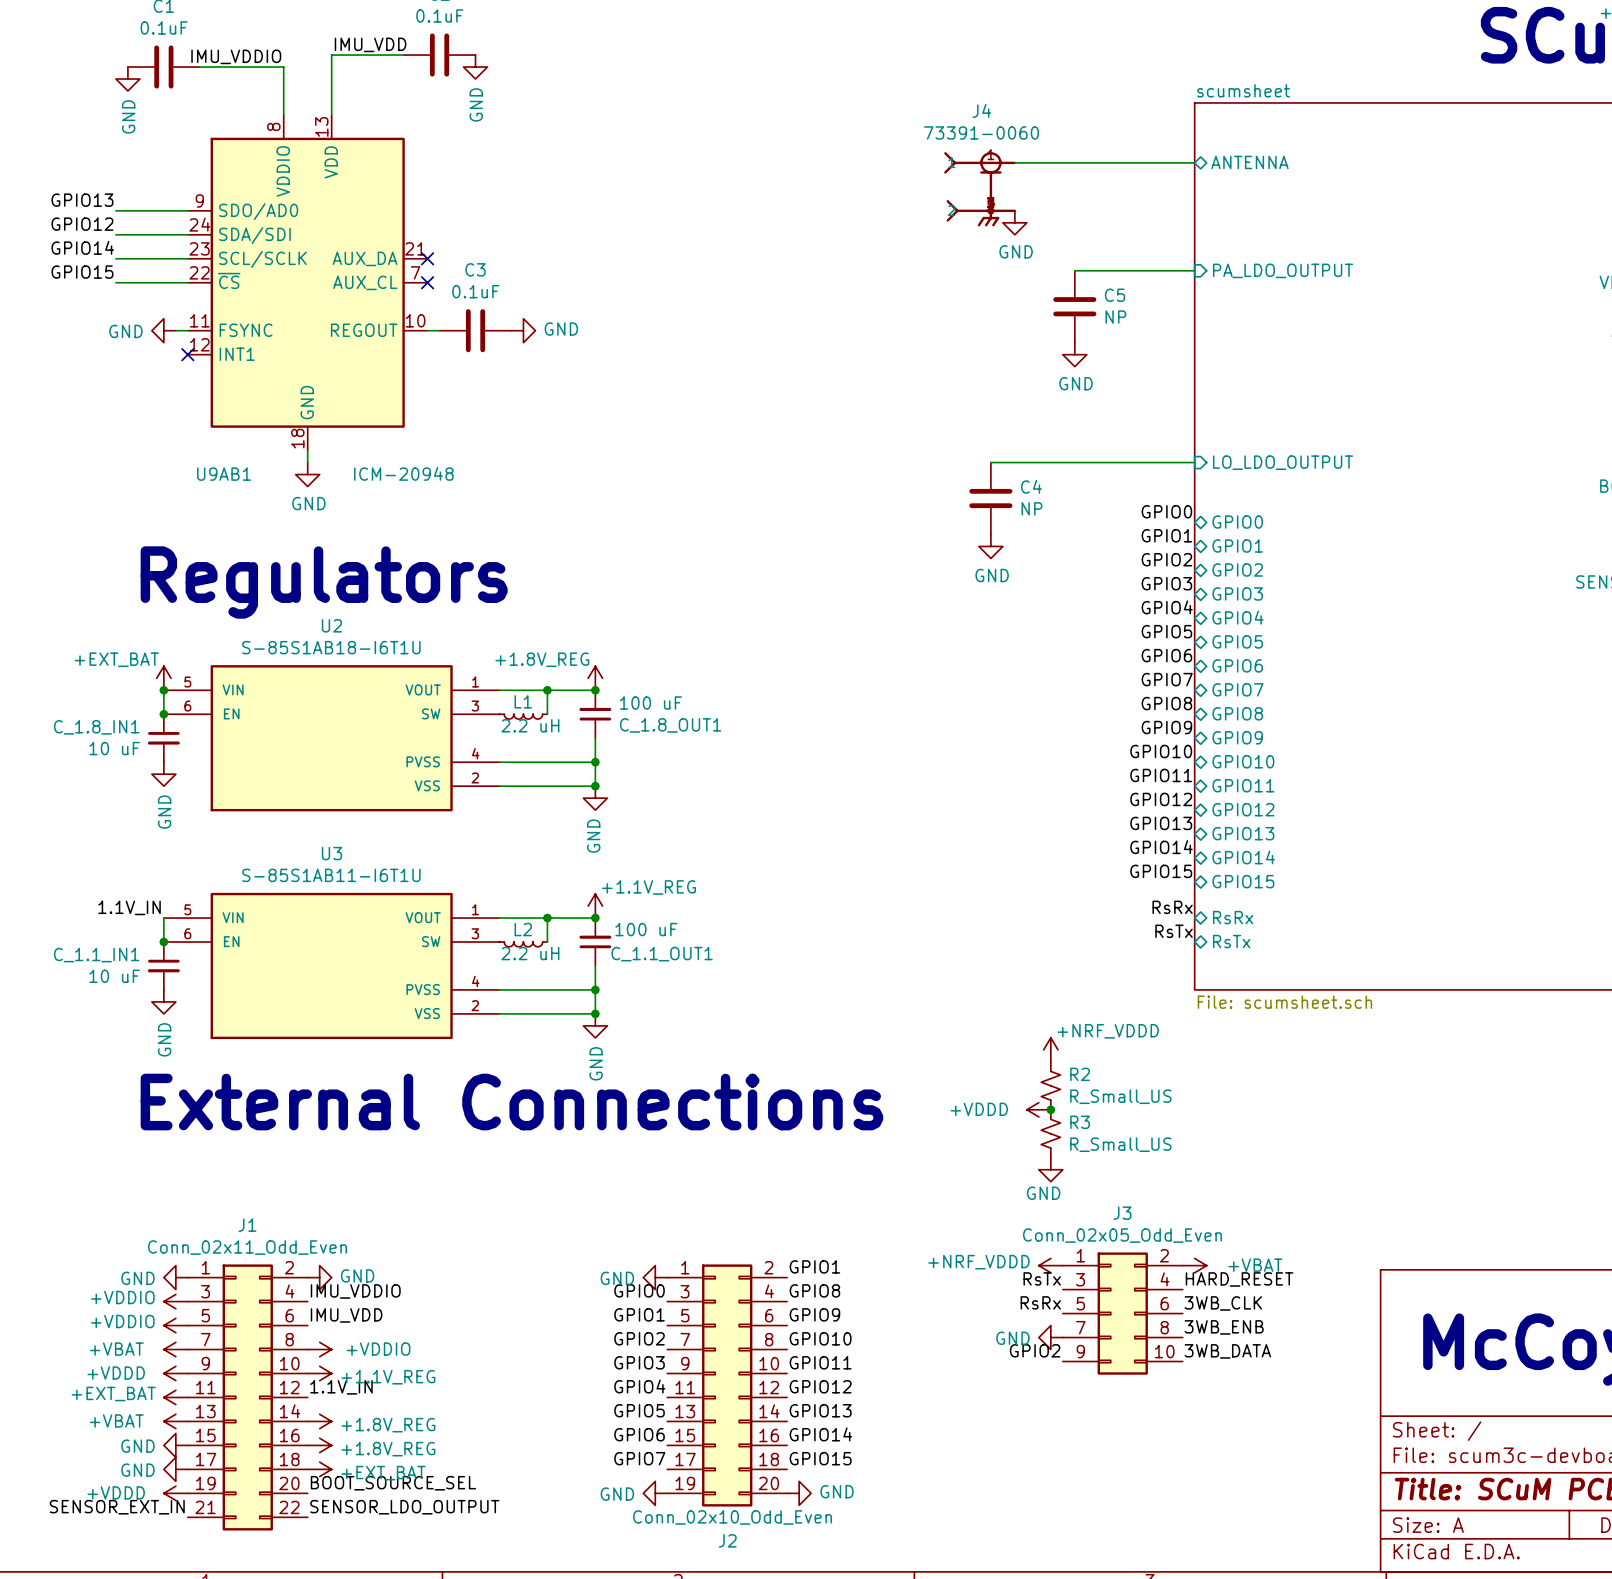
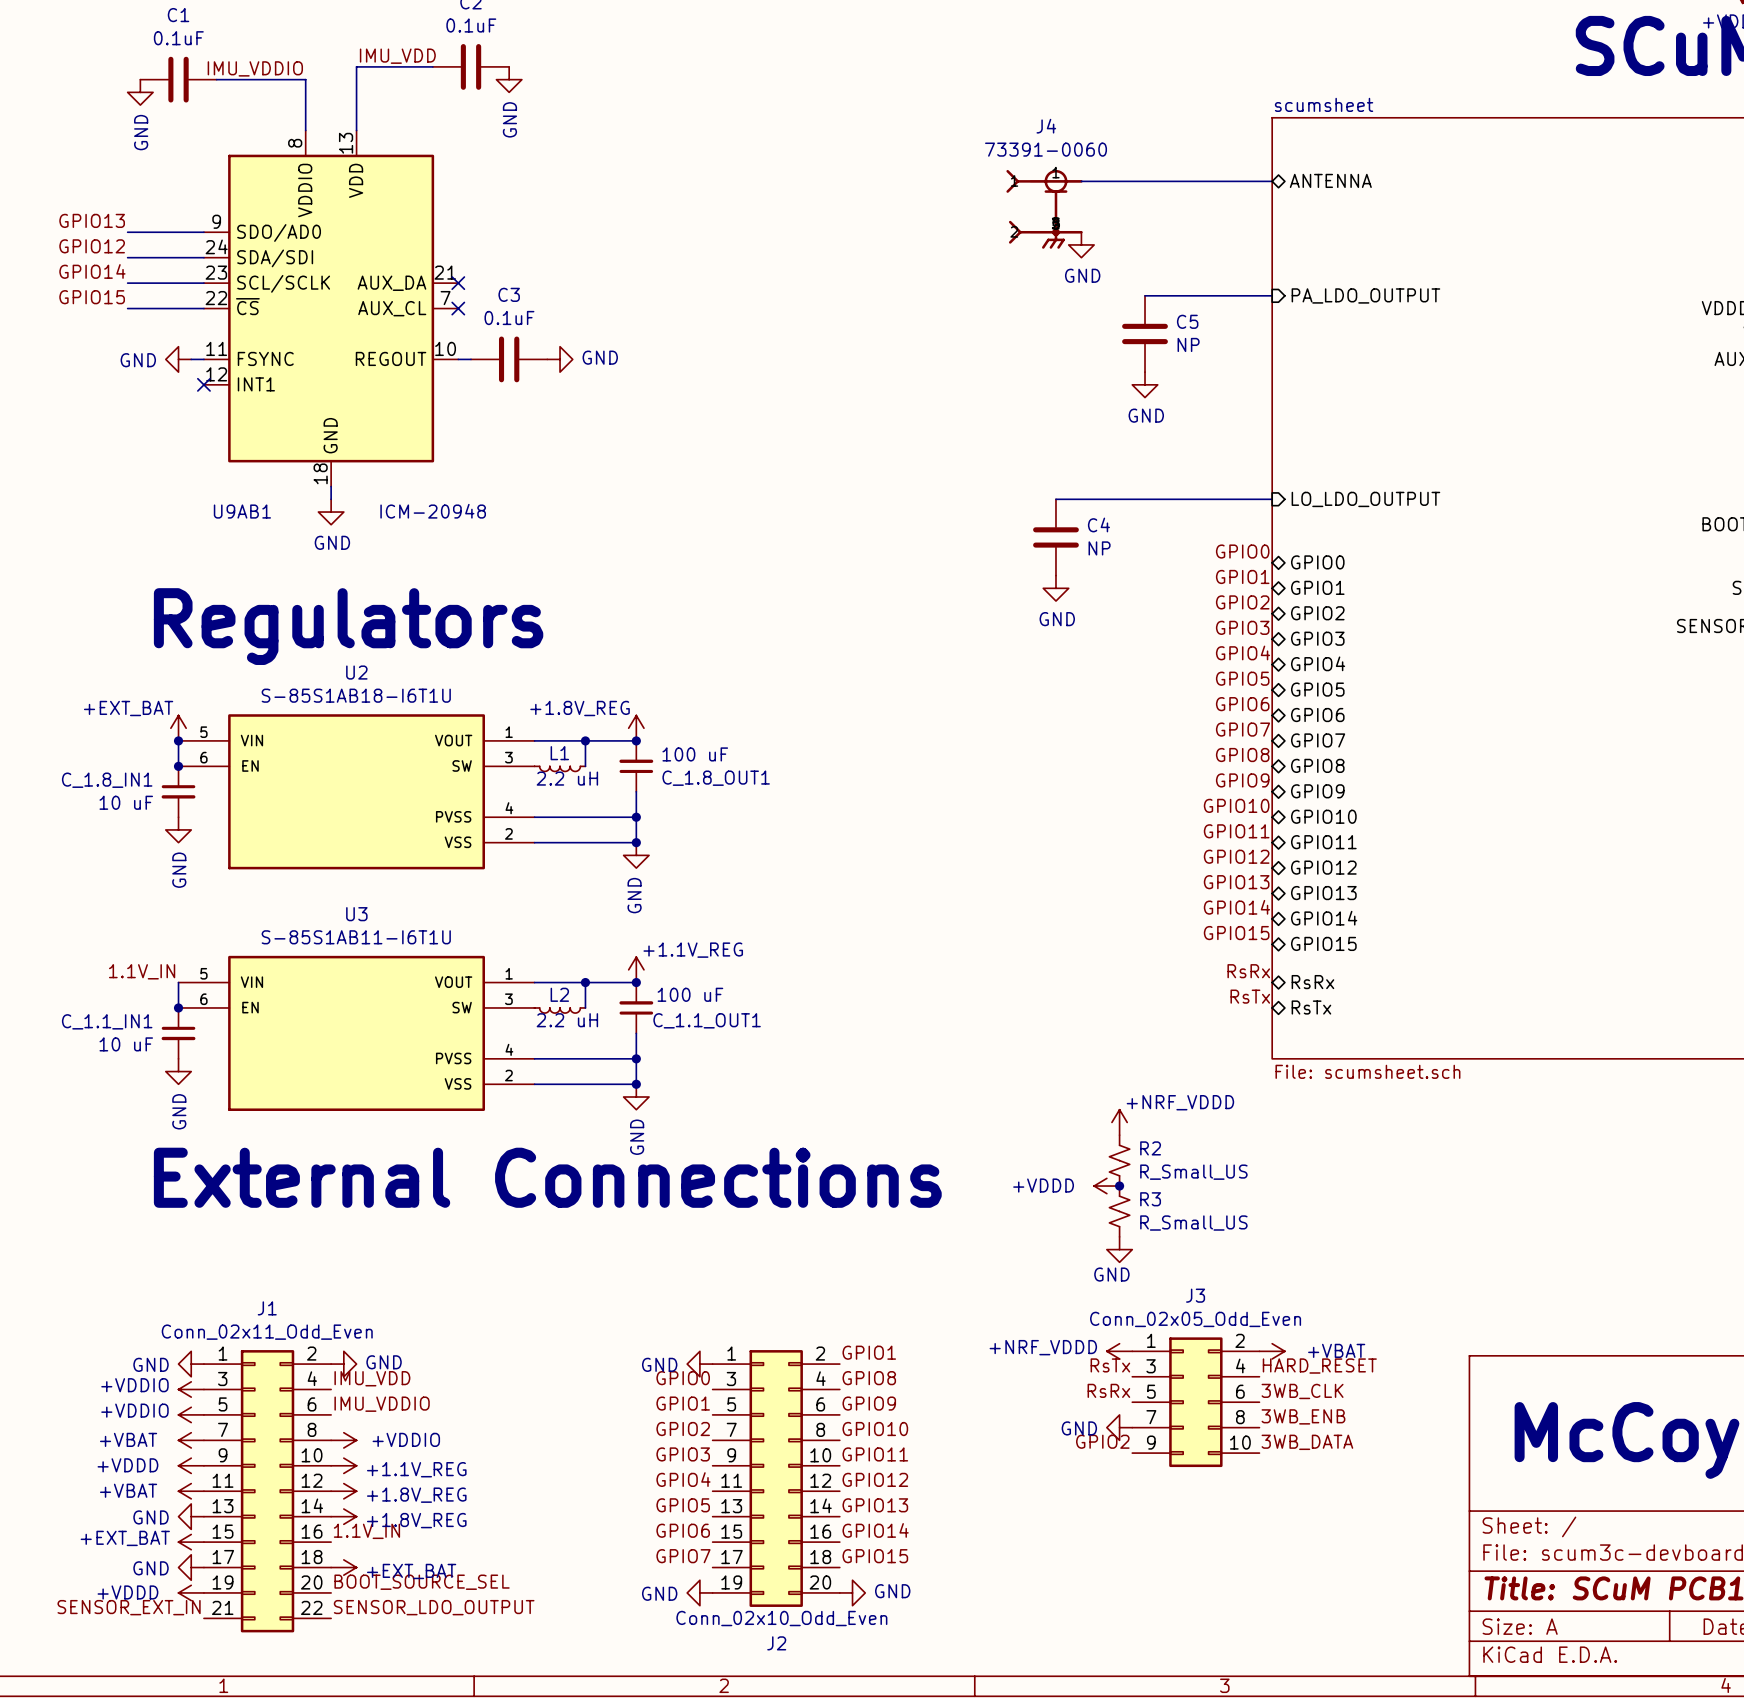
label: IMU_VDDIO (355, 1291) -> IMU_VDD (372, 1378)
label: IMU_VDD (346, 1315) -> IMU_VDDIO (382, 1404)
label position: 1.1V_IN (341, 1387) -> 1.1V_IN (366, 1531)
power symbol: +EXT_BAT (175, 1397) -> +VBAT (191, 1491)
power symbol: +VBAT (175, 1421) -> GND (191, 1516)
power symbol: GND (175, 1445) -> +EXT_BAT (191, 1542)
power symbol position: +1.8V_REG (319, 1445) -> +1.8V_REG (343, 1491)

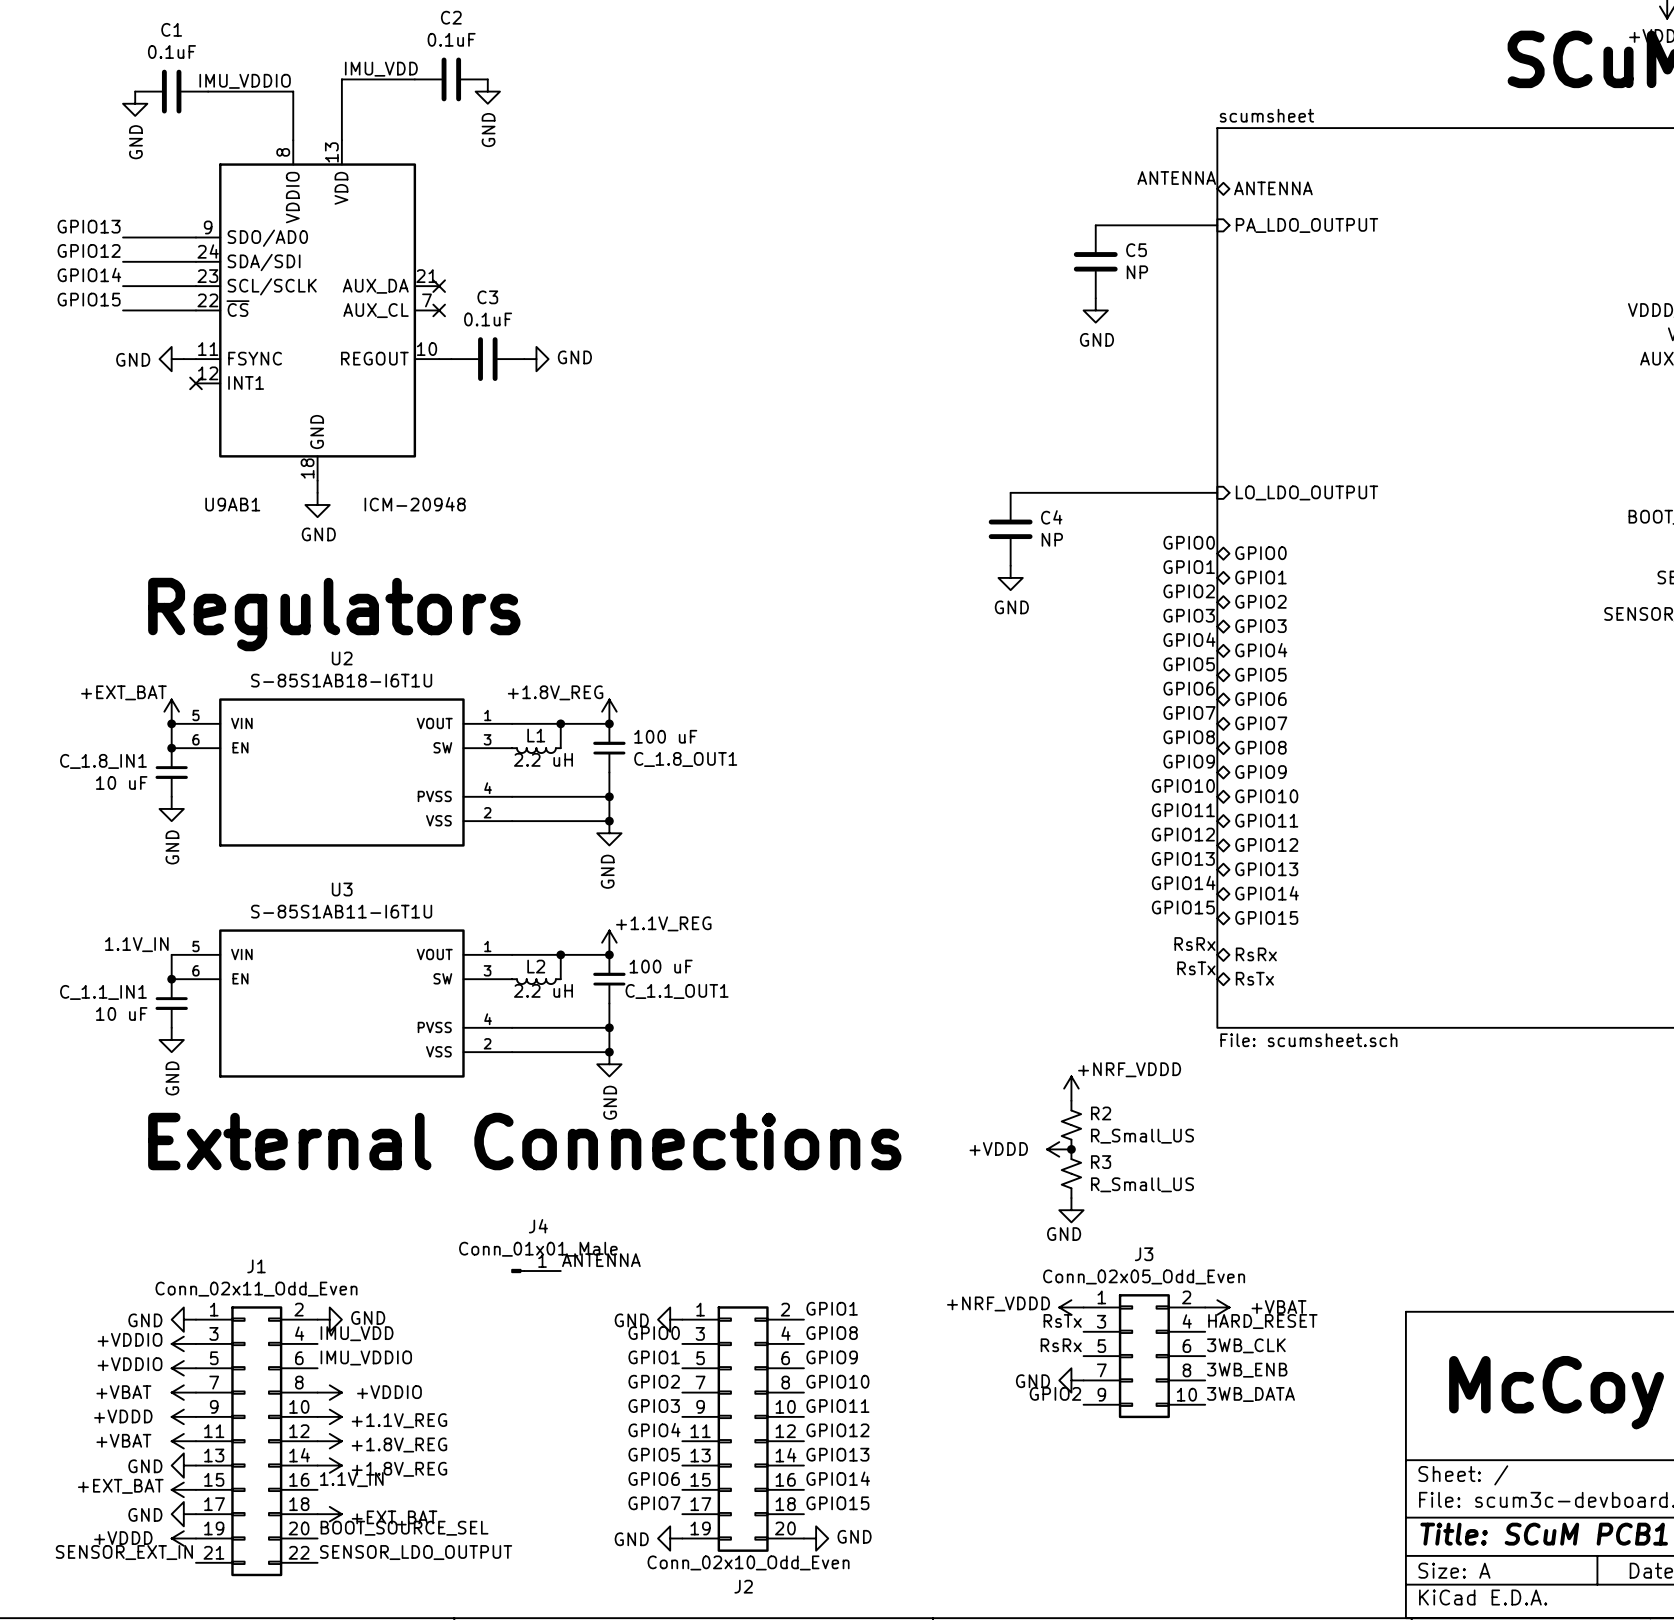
J4 name position: J4 (1046, 126) -> J4 (538, 1226)
J4 value: 73391-0060 (1046, 149) -> Conn_01x01_Male (538, 1249)
J4 symbol: [1006, 169, 1083, 249] -> [511, 1269, 561, 1273]
label: none -> ANTENNA (1176, 178)
wire: (1081, 181) (1272, 181) -> none
power symbol: GND (1081, 244) -> none
wire: (1145, 295) (1272, 295) -> (1095, 225) (1217, 225)
sheet pin position: PA_LDO_OUTPUT (1365, 295) -> PA_LDO_OUTPUT (1306, 225)
power symbol: none -> GND (1095, 310)
C5 position: (1145, 333) -> (1095, 261)
power symbol: GND (1145, 384) -> none
label: none -> ANTENNA (601, 1260)

